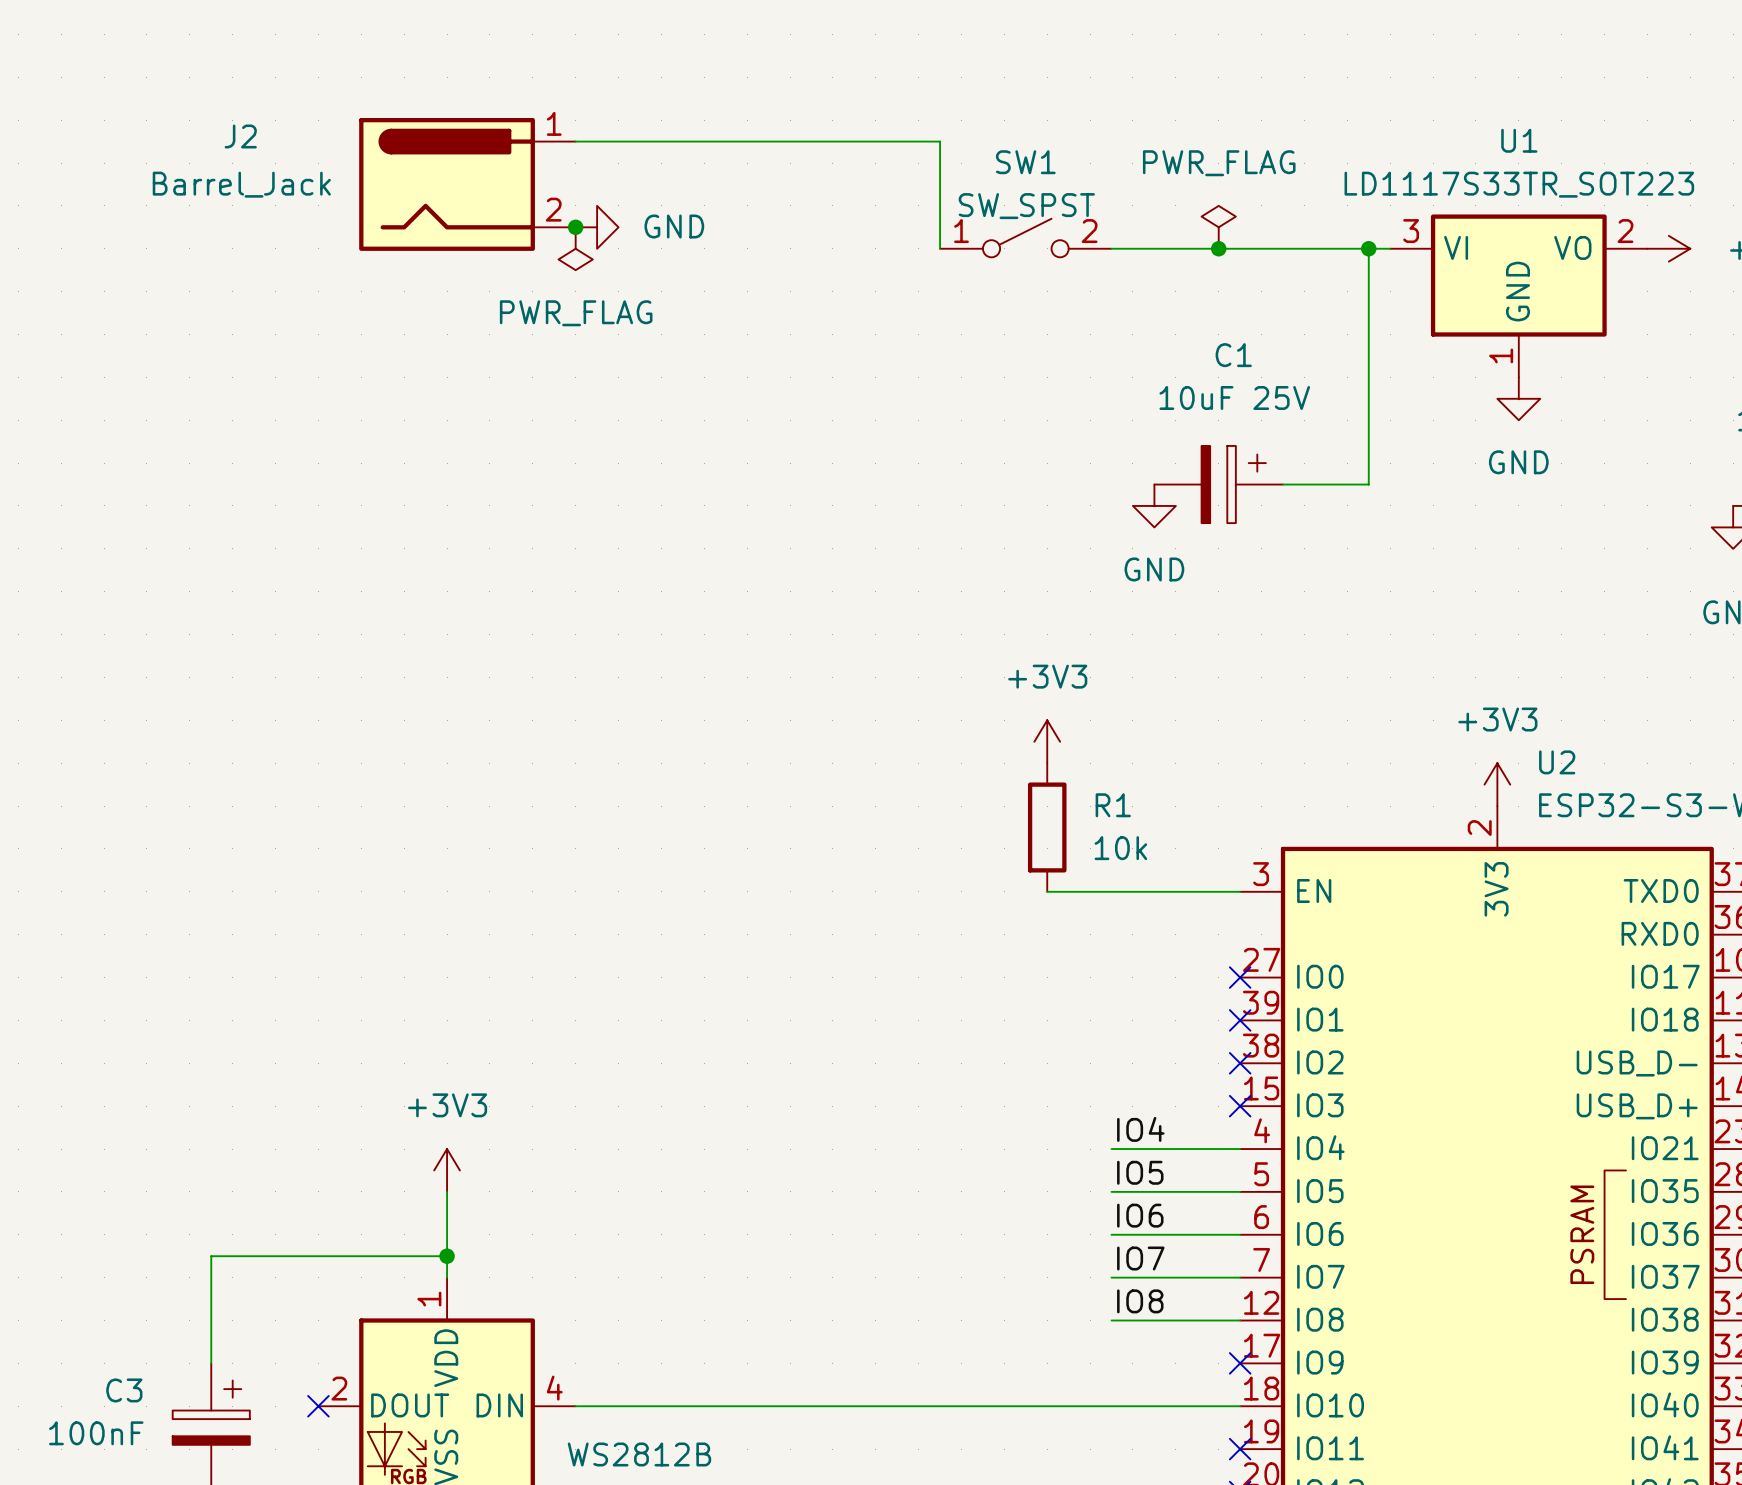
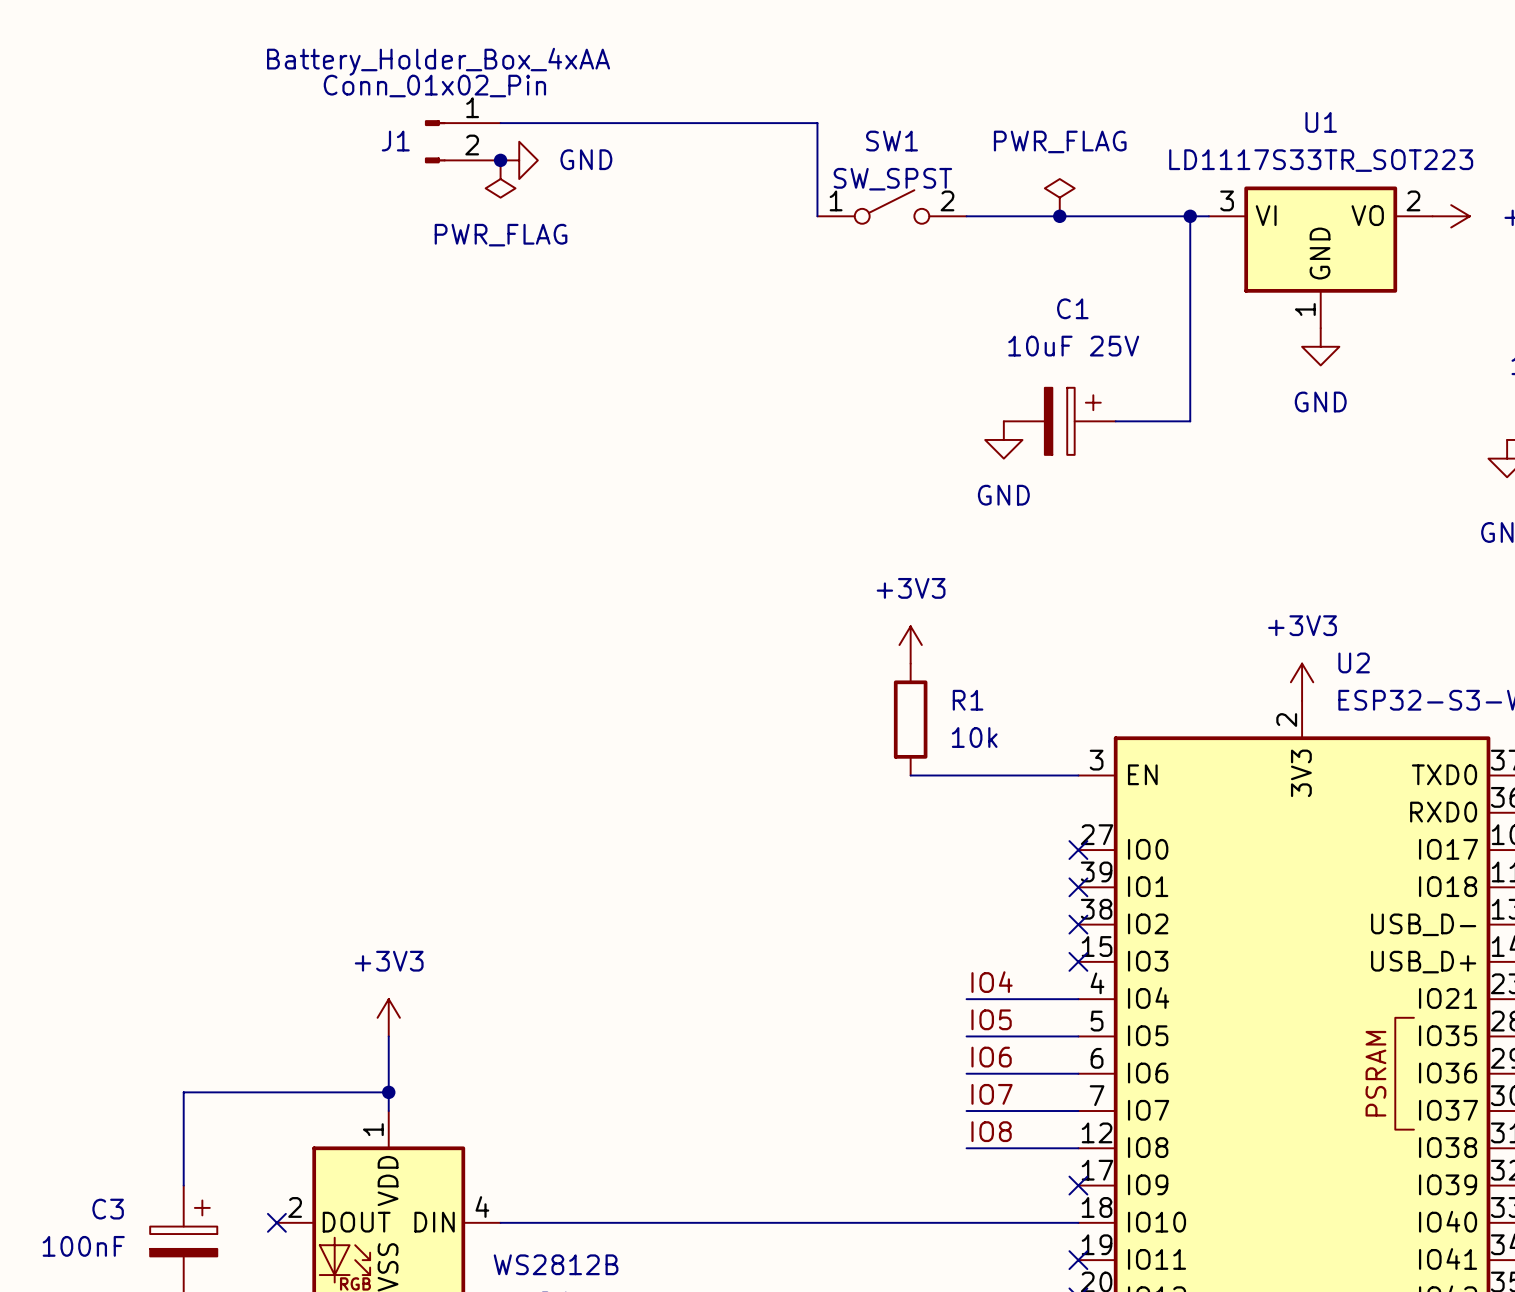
text: none -> Battery_Holder_Box_4xAA (438, 61)
J1: none -> Conn_01x02_Pin (462, 141)
J2: Barrel_Jack (467, 184) -> none
junction position: (575, 227) -> (500, 160)
power symbol position: GND (597, 227) -> GND (519, 160)
power symbol position: PWR_FLAG (575, 248) -> PWR_FLAG (500, 179)

